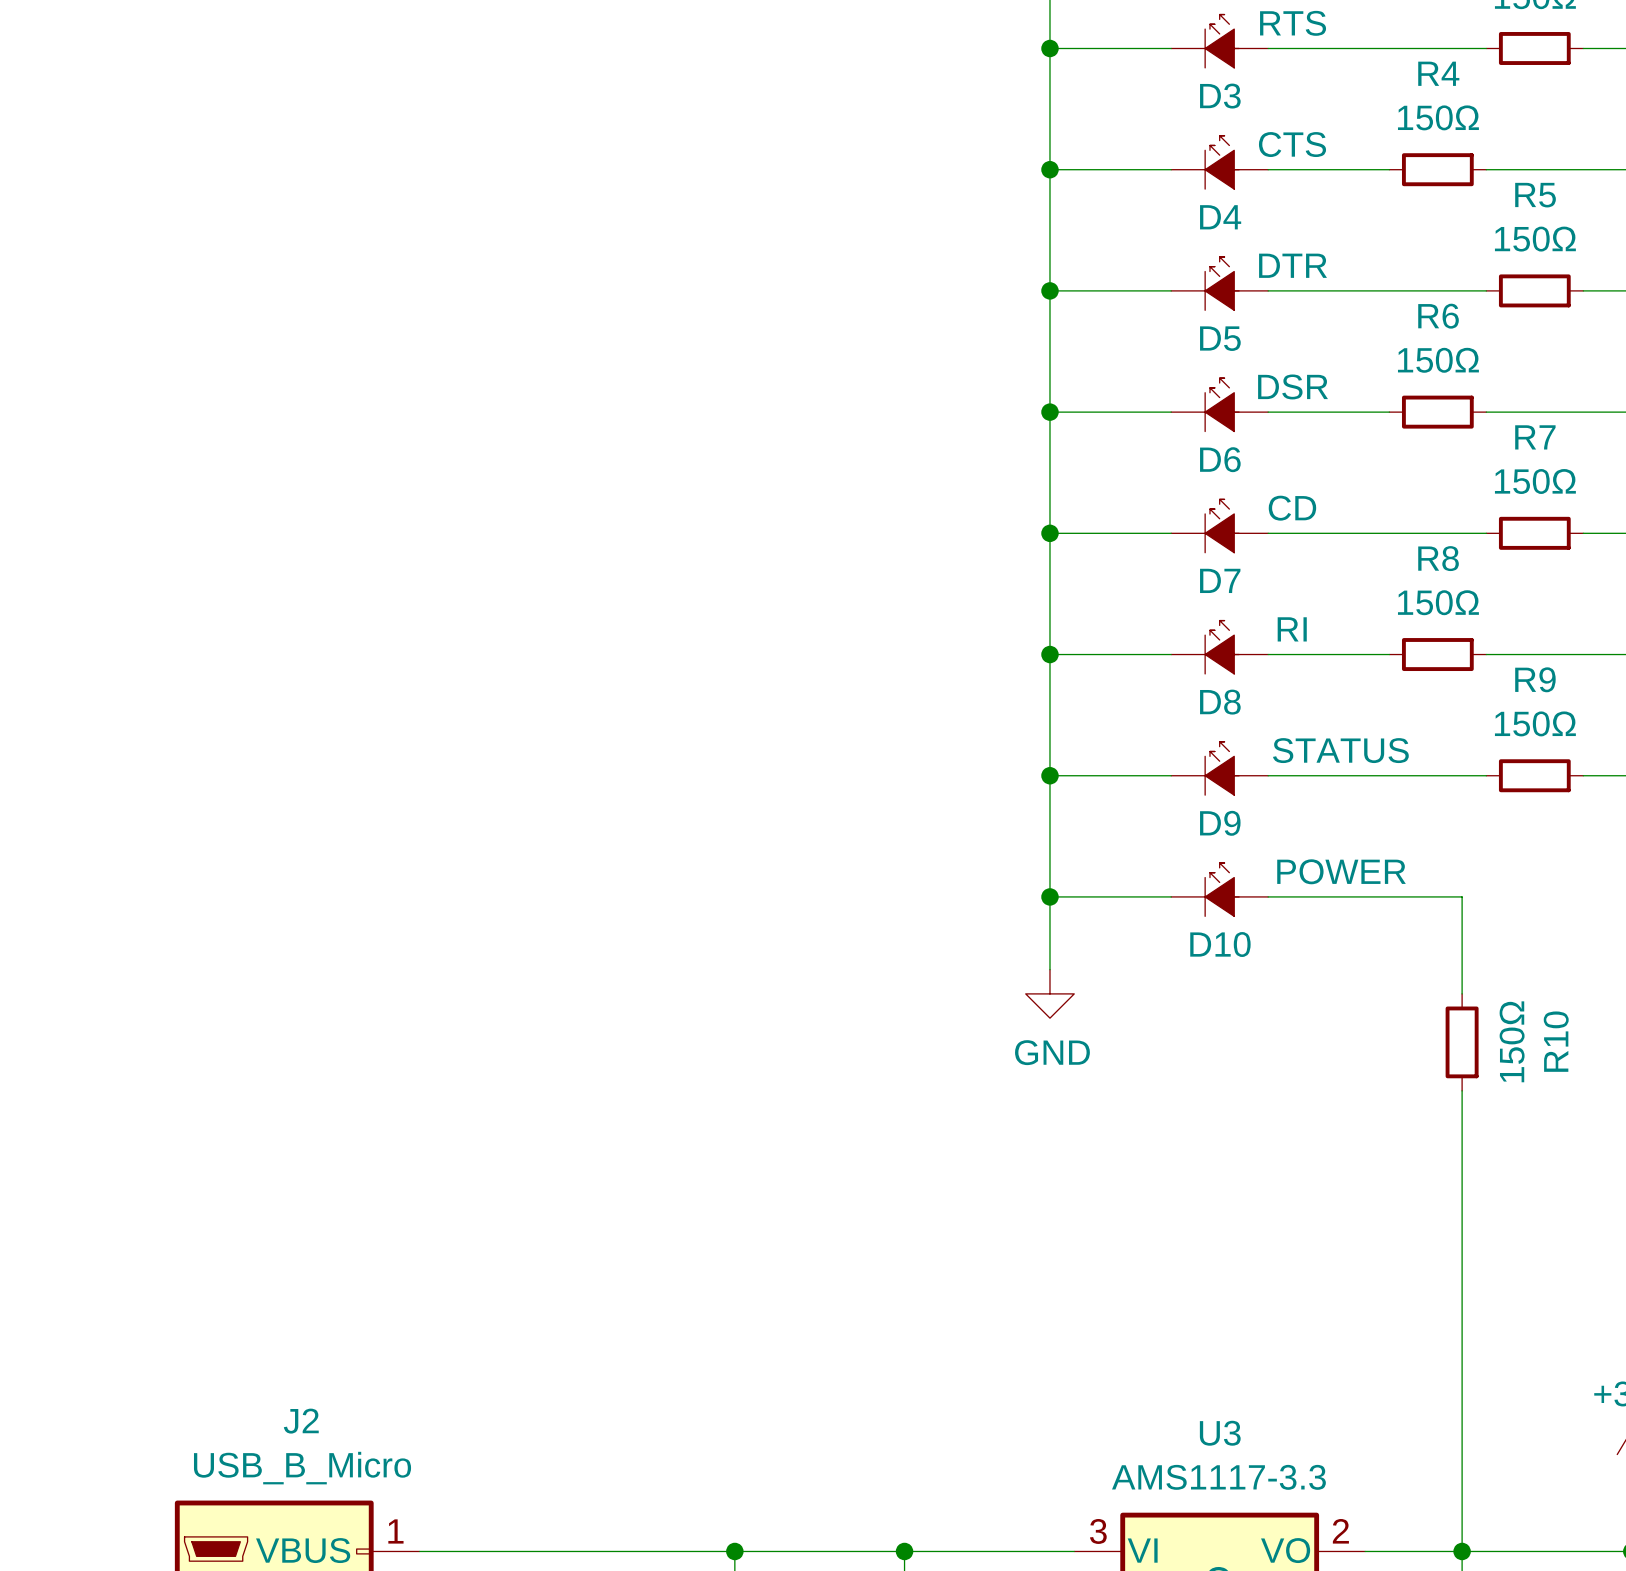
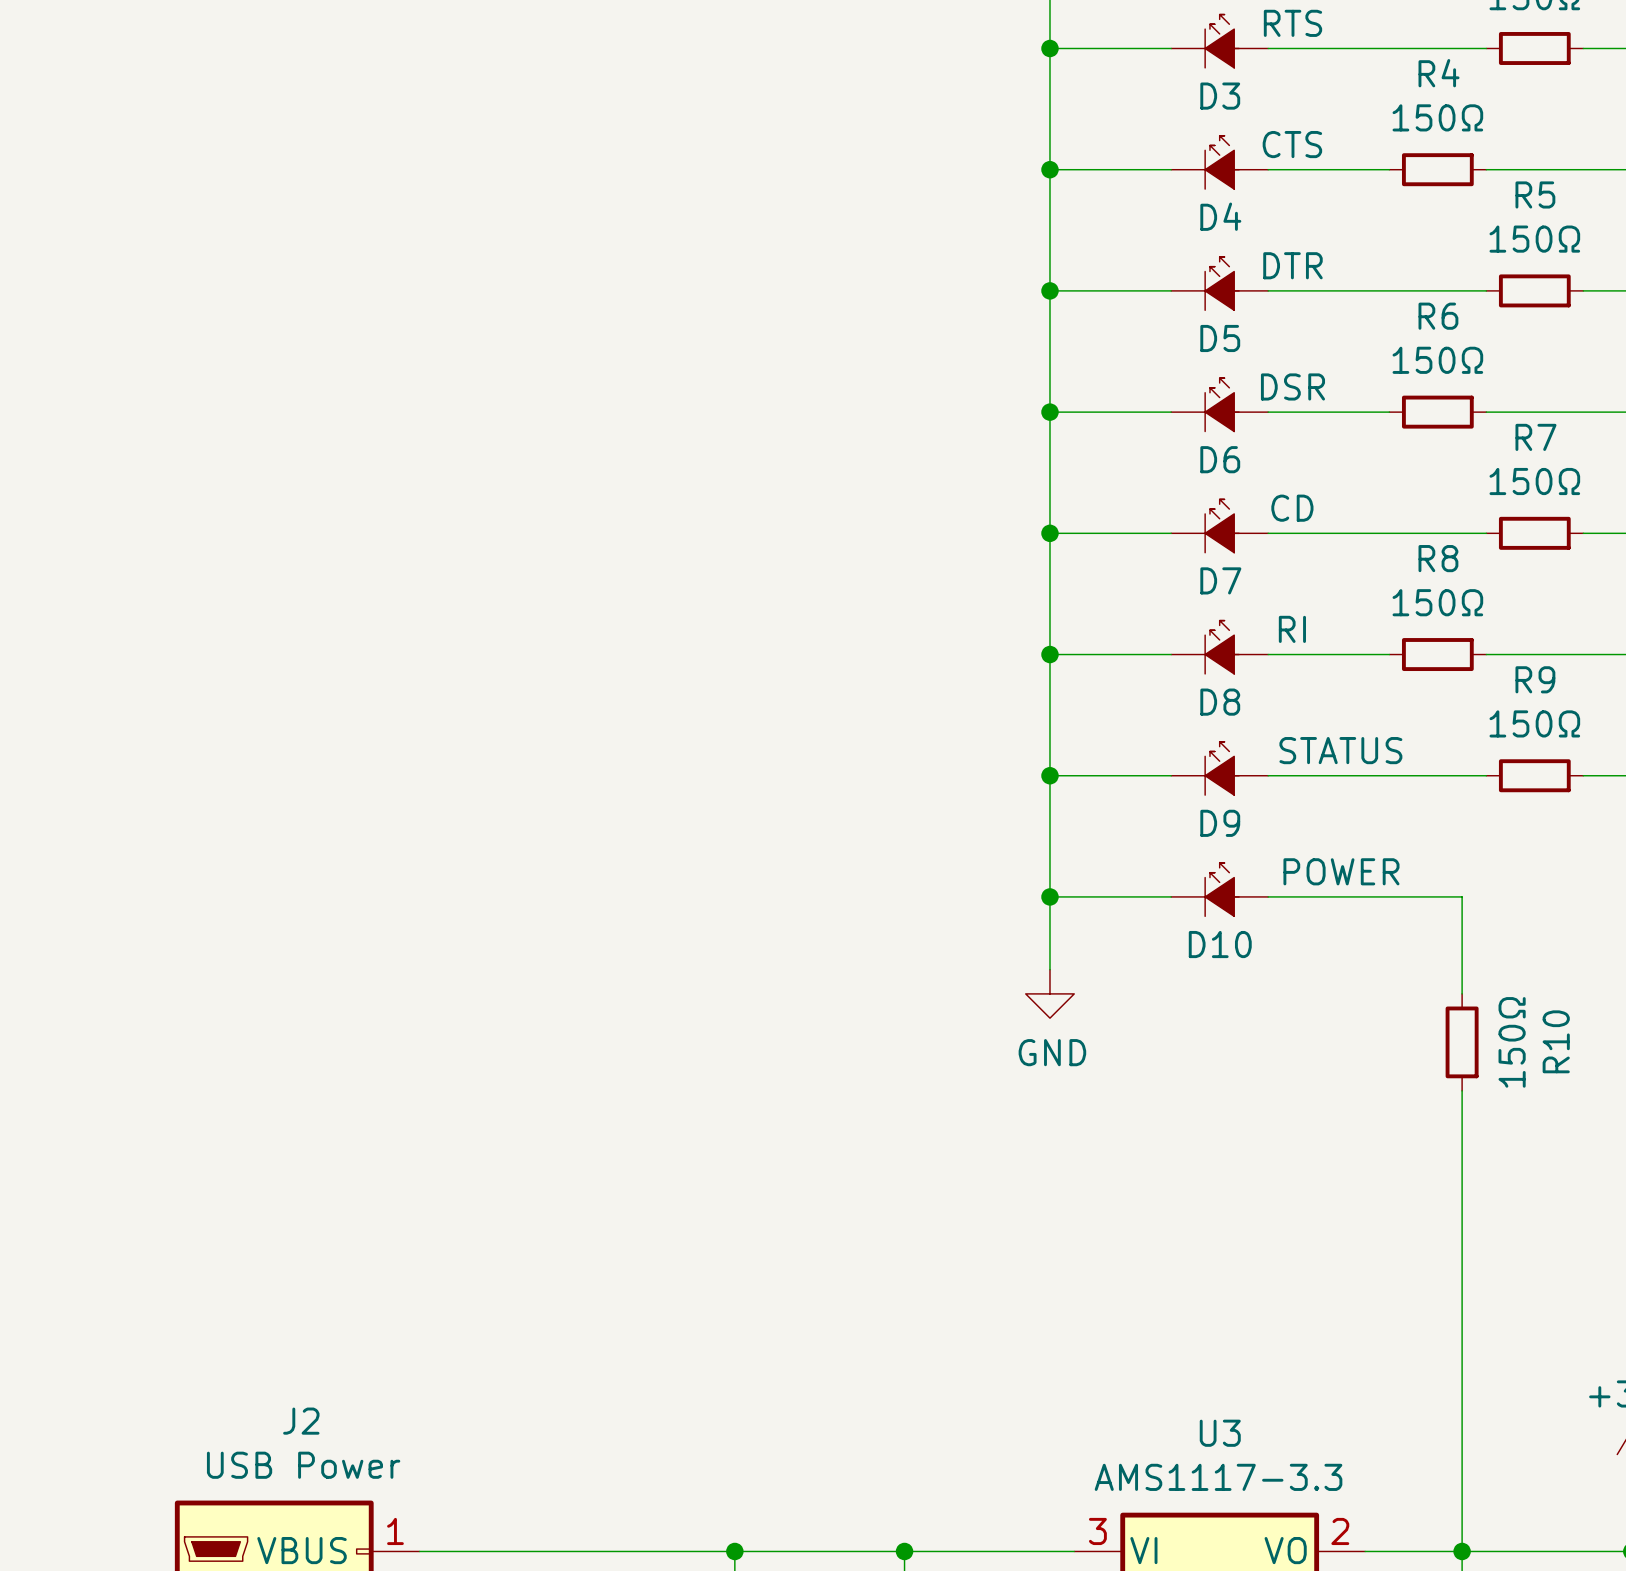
J2 value: USB_B_Micro (302, 1468) -> USB Power (303, 1465)

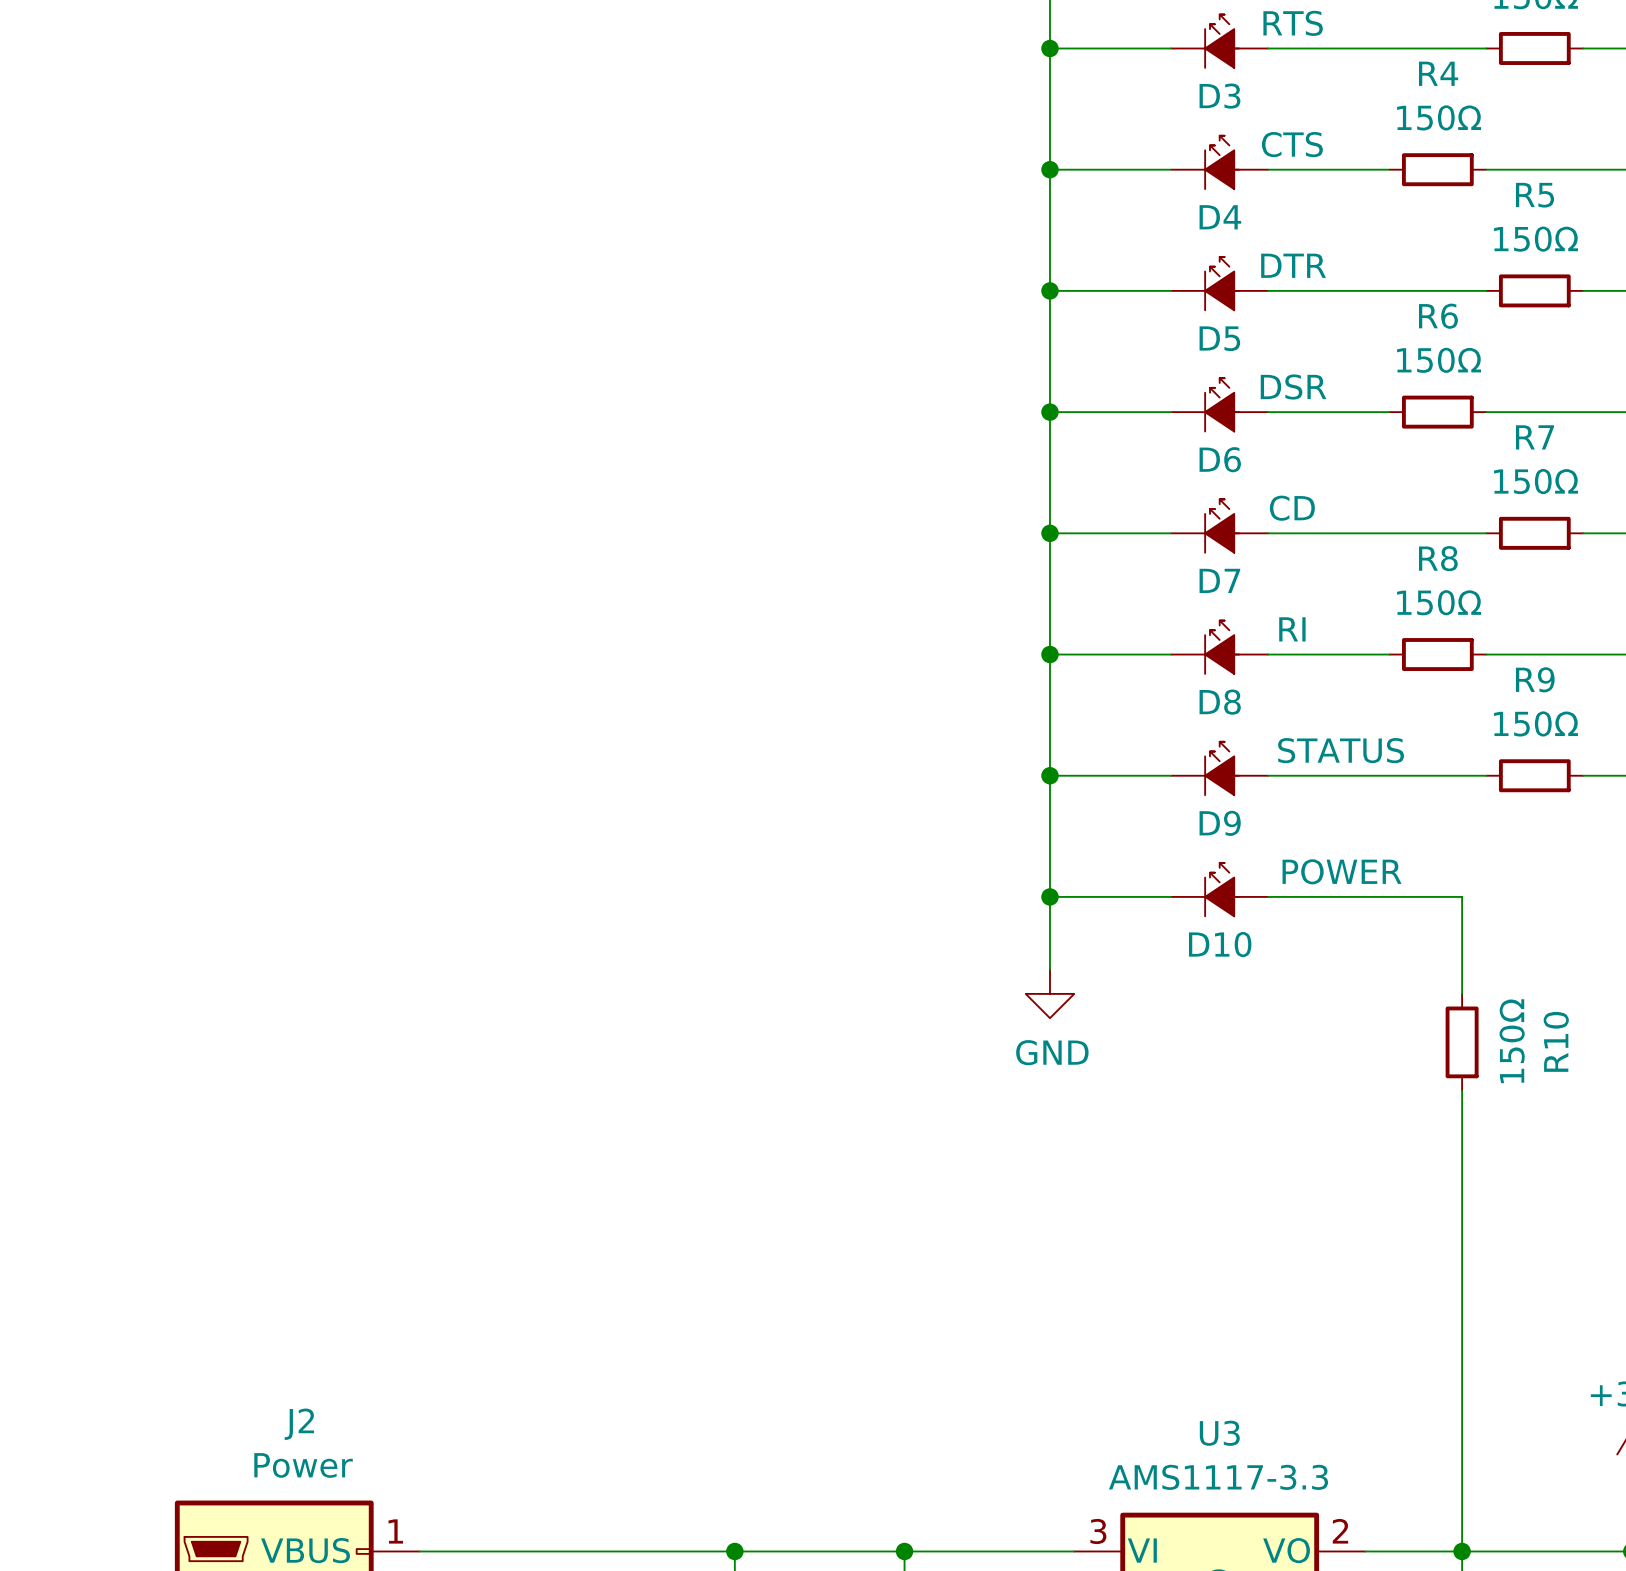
J2 value: USB Power (303, 1465) -> Power (303, 1465)

